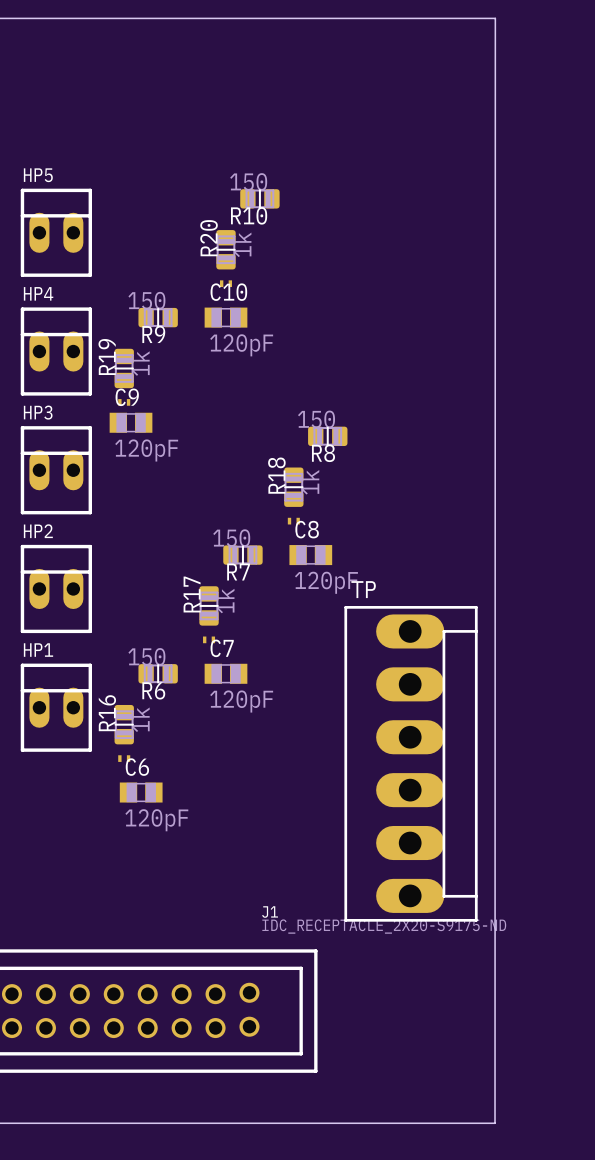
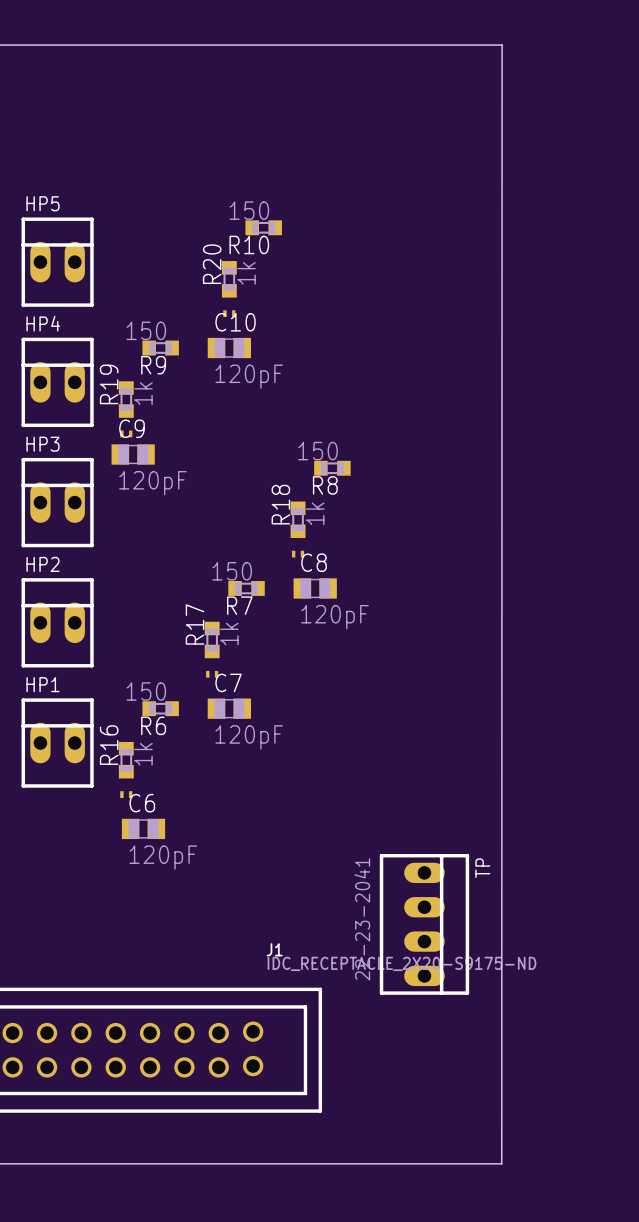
R10 footprint: [240, 189, 280, 209] -> [245, 220, 282, 236]
R20 footprint: [216, 230, 236, 270] -> [221, 261, 237, 298]
R9 footprint: [138, 307, 178, 328] -> [142, 340, 179, 356]
R19 footprint: [114, 348, 134, 389] -> [118, 381, 134, 418]
R8 footprint: [308, 426, 348, 447] -> [314, 460, 351, 476]
R18 footprint: [284, 467, 304, 507] -> [290, 501, 306, 539]
R7 footprint: [223, 545, 263, 565] -> [228, 581, 265, 596]
R17 footprint: [199, 586, 219, 626] -> [204, 621, 220, 659]
R6 footprint: [138, 664, 178, 684] -> [142, 701, 179, 717]
R16 footprint: [114, 704, 134, 745] -> [118, 741, 134, 779]
TP: (411, 763) -> none
TP: none -> 22-23-2041 (424, 924)

